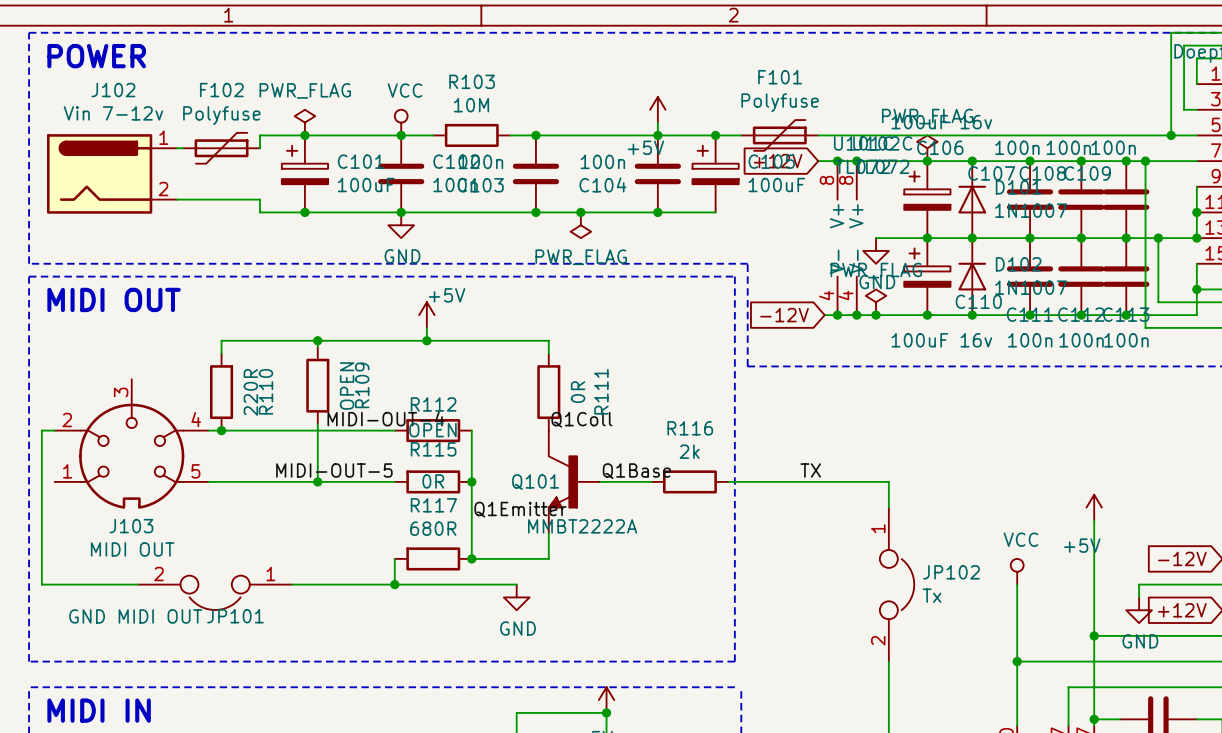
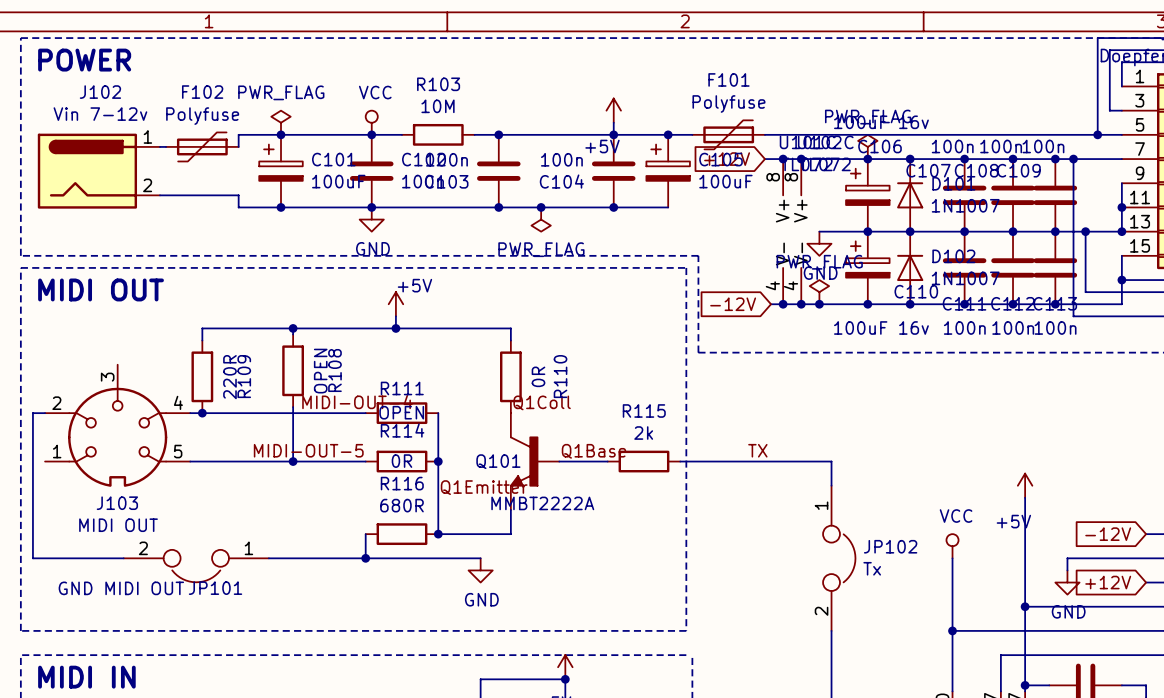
R109 name: R109 (362, 385) -> R108 (334, 370)
R110 name: R110 (265, 391) -> R109 (244, 376)
R111 name: R111 (601, 391) -> R110 (560, 376)
R112 name: R112 (433, 404) -> R111 (402, 388)
R116 name: R116 (690, 428) -> R115 (644, 410)
R115 name: R115 (433, 449) -> R114 (402, 430)
R117 name: R117 (433, 505) -> R116 (402, 483)

